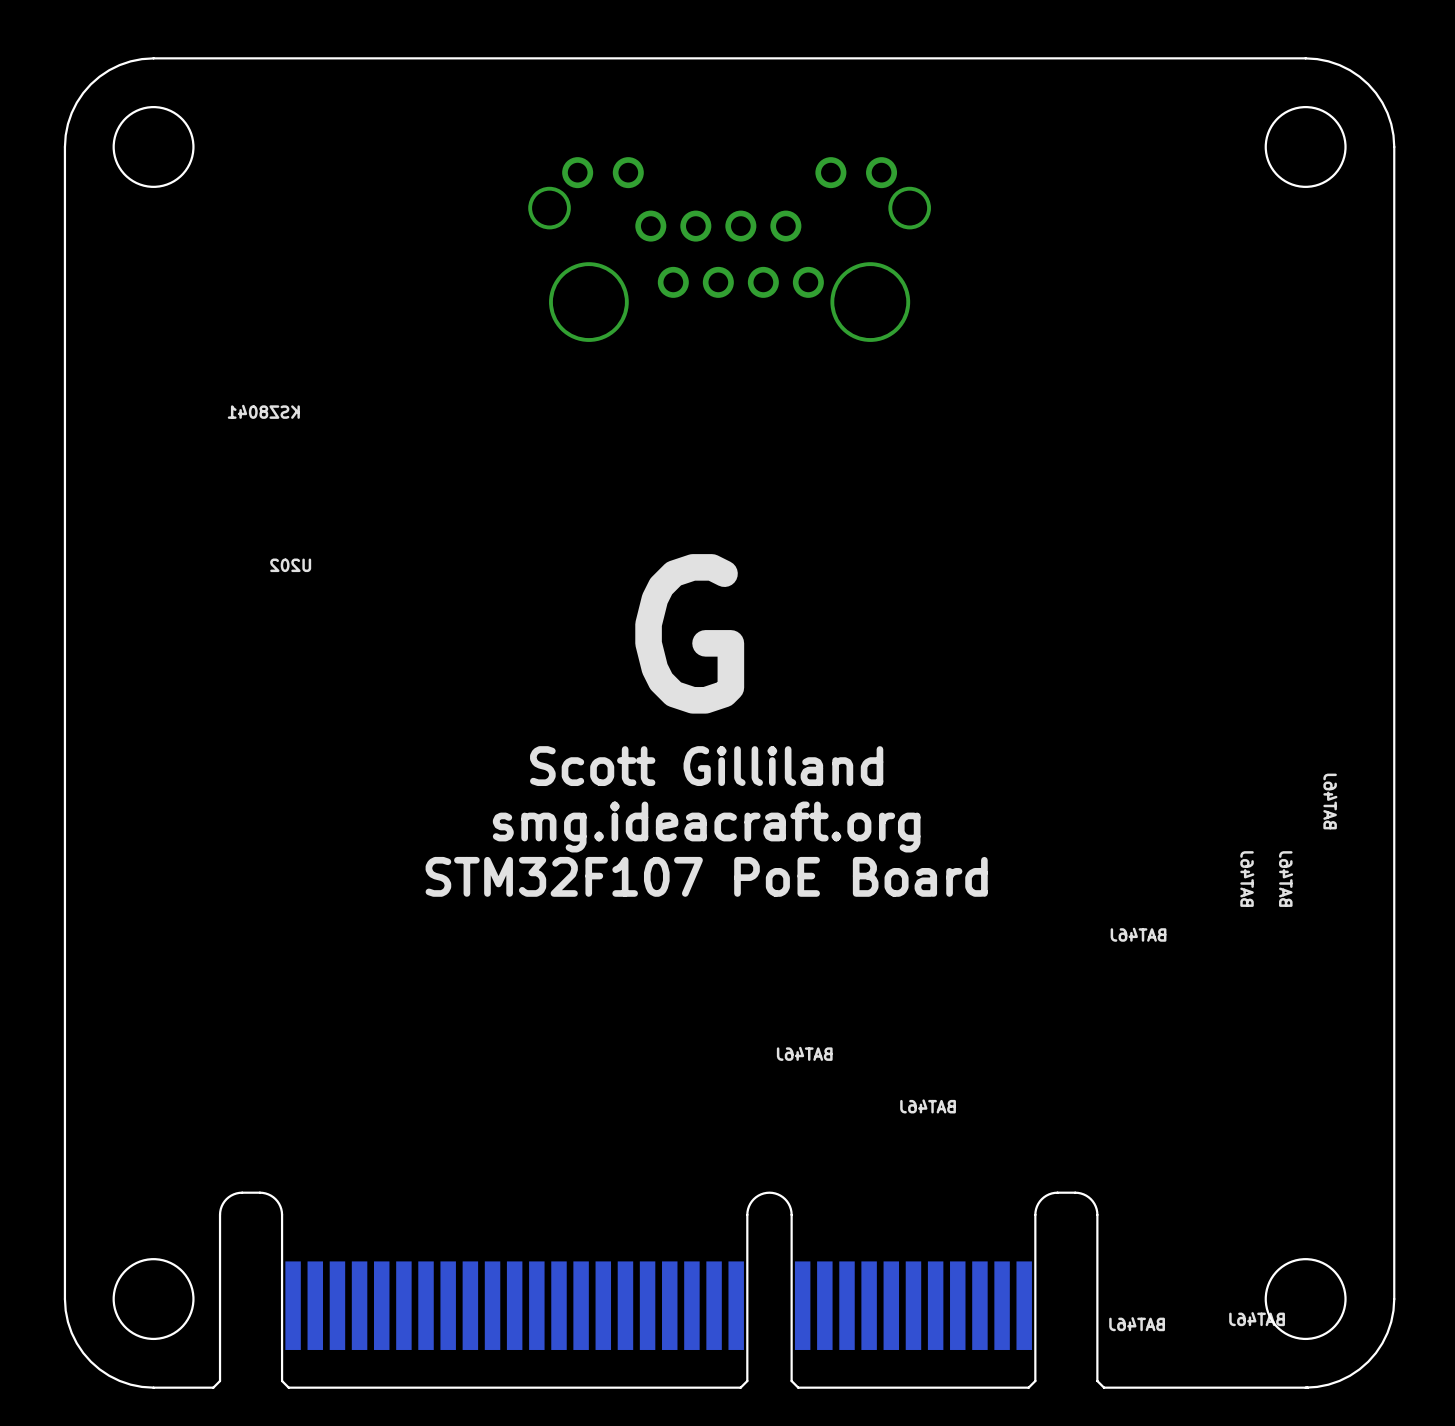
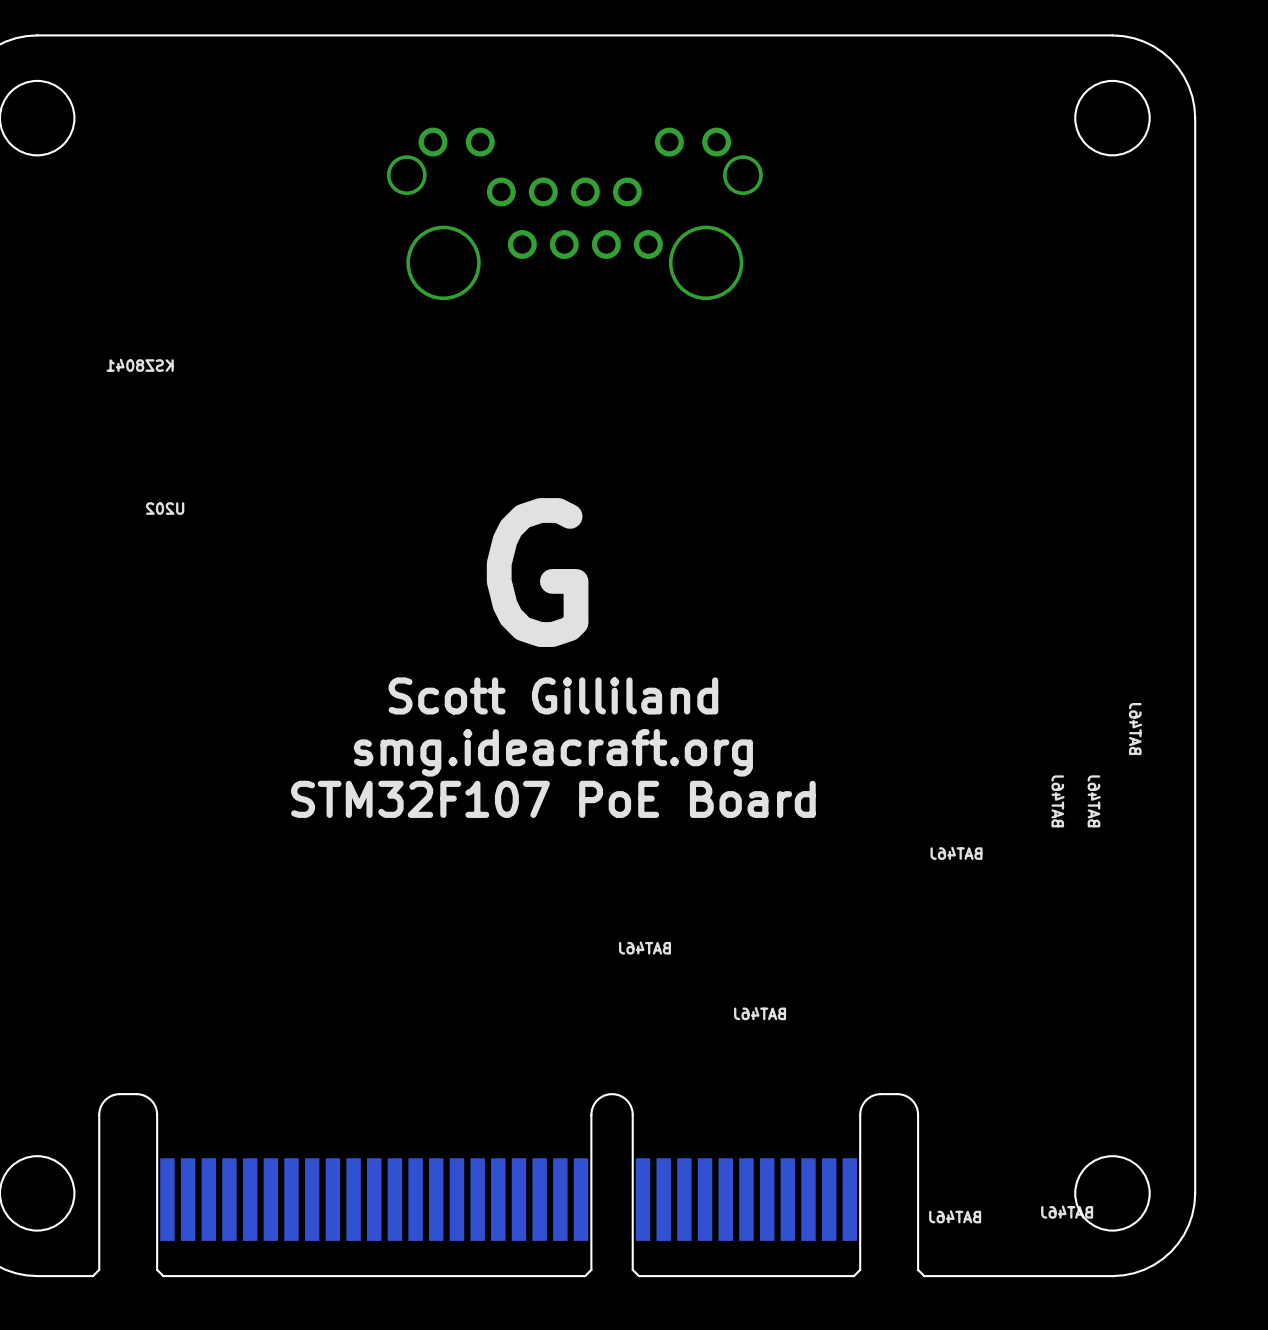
part position: (804, 1053) -> (644, 948)

